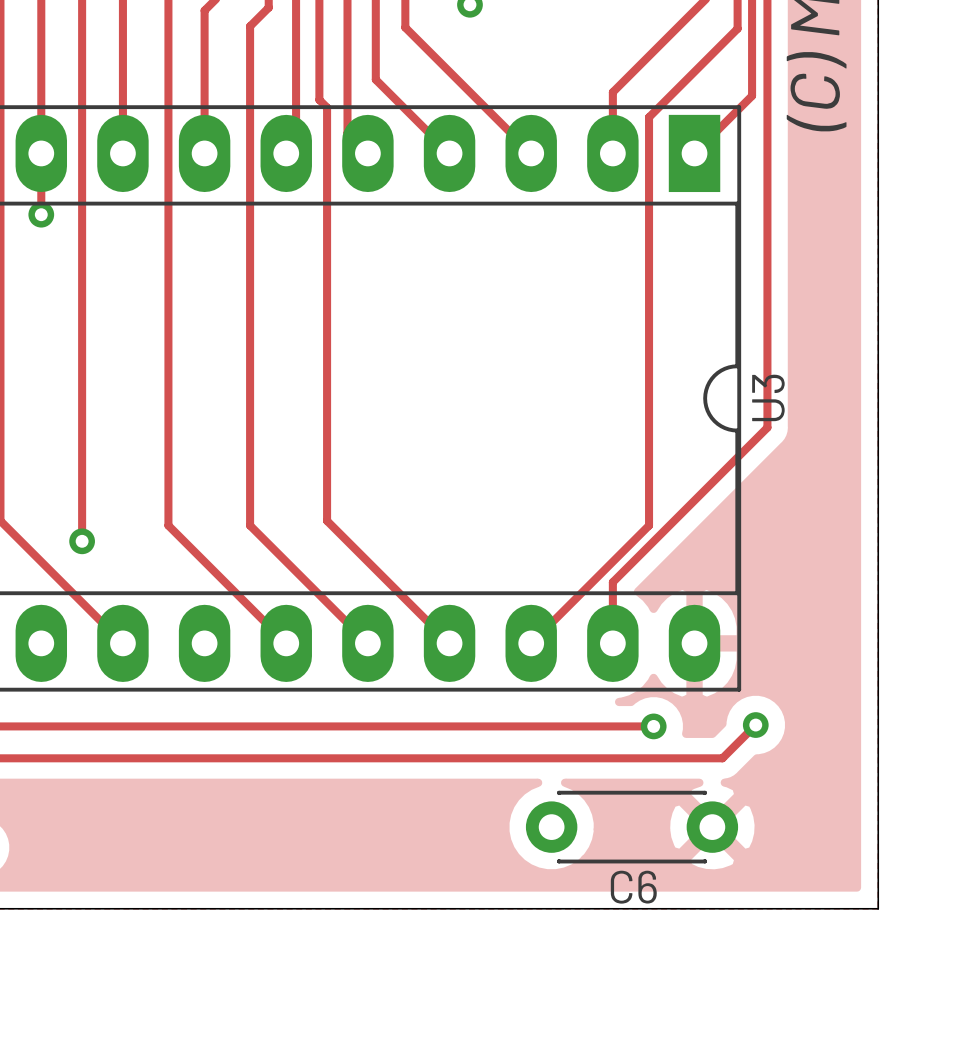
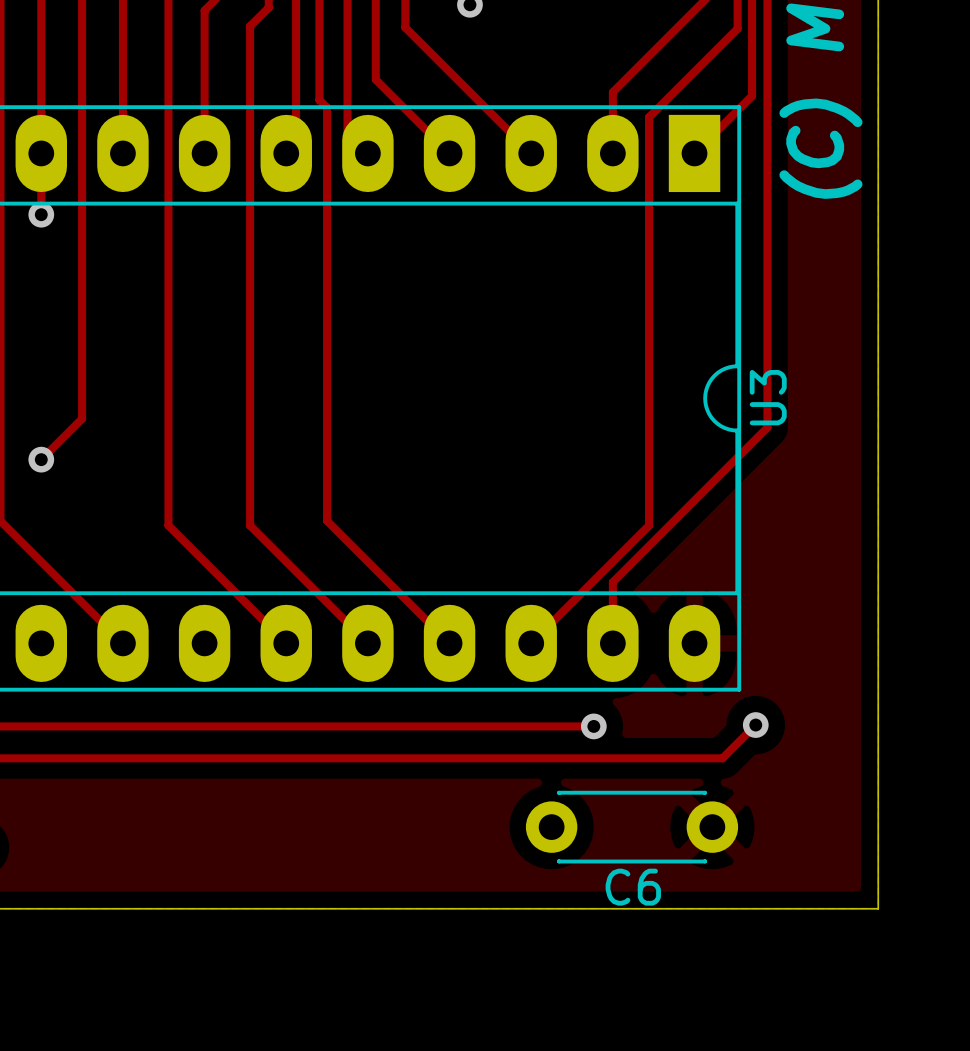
track: (82, 418) (82, 541) -> (82, 418) (41, 459)
via: none -> (41, 459)
via: (82, 541) -> none
track: (593, 726) (653, 726) -> none
via position: (653, 726) -> (593, 726)

